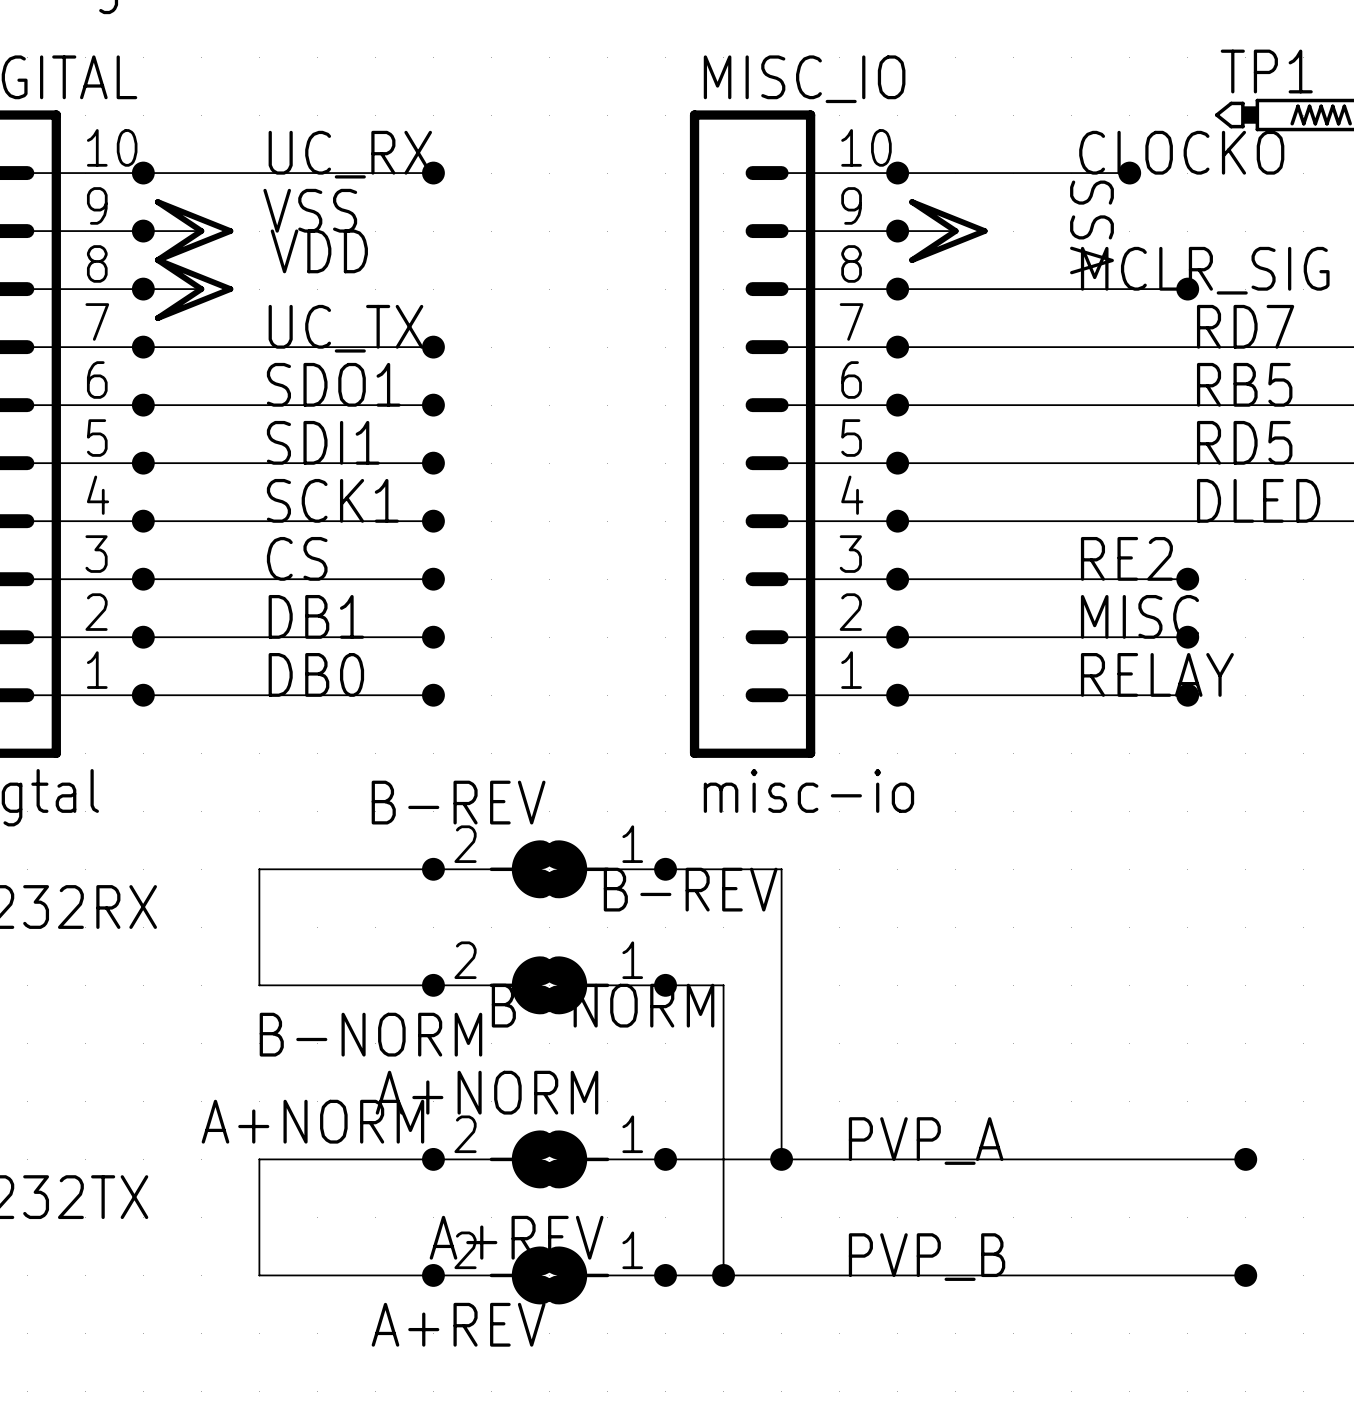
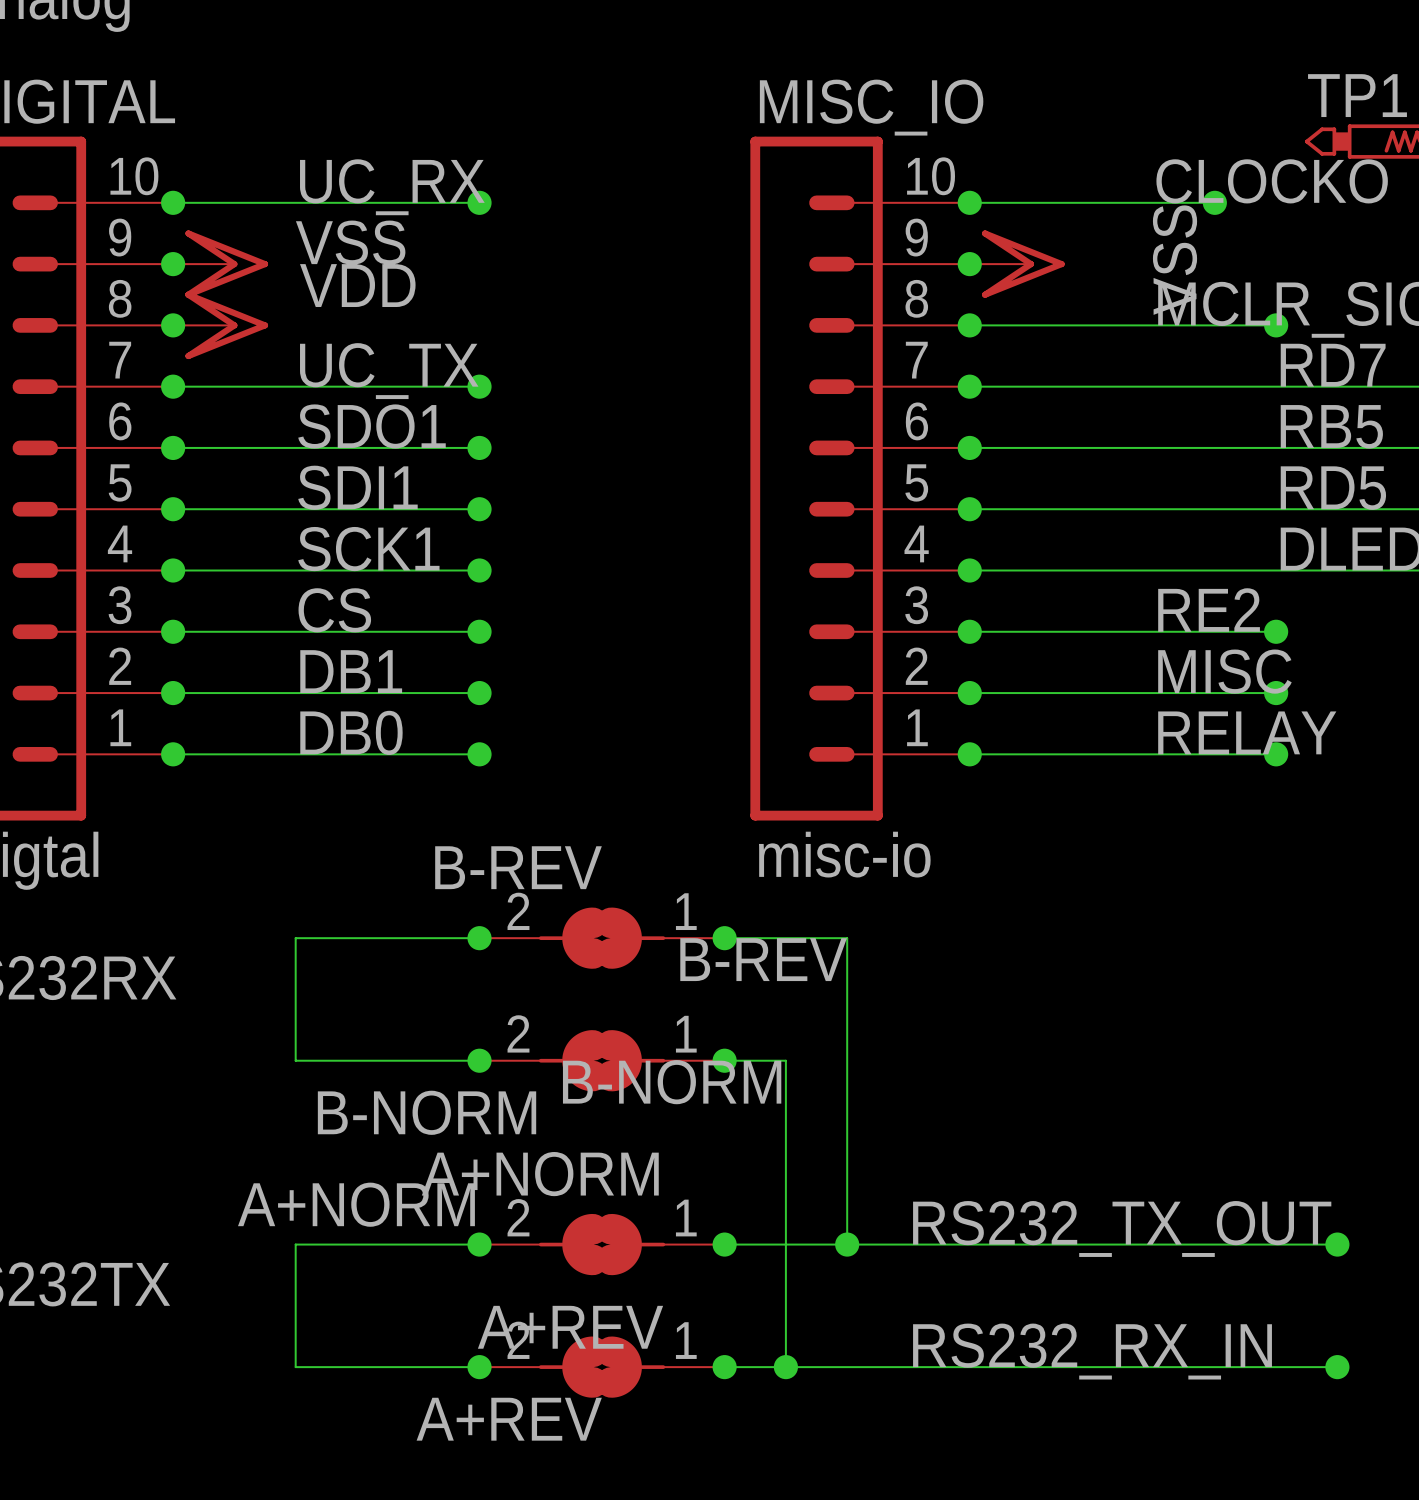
label: PVP_A (926, 1141) -> RS232_TX_OUT (1122, 1228)
label: PVP_B (927, 1257) -> RS232_RX_IN (1092, 1351)

